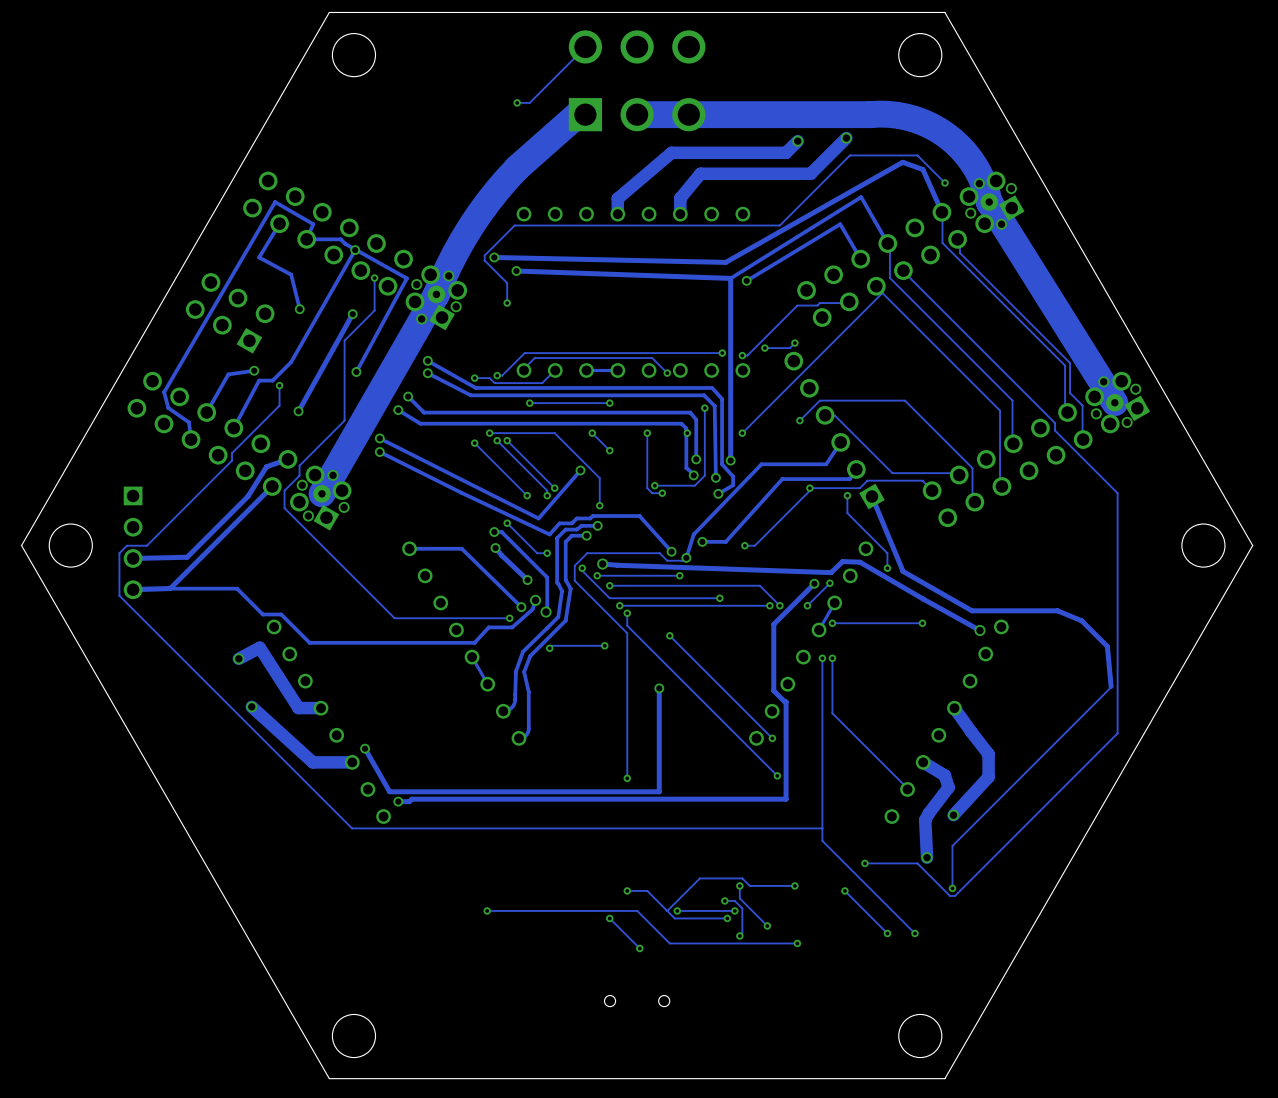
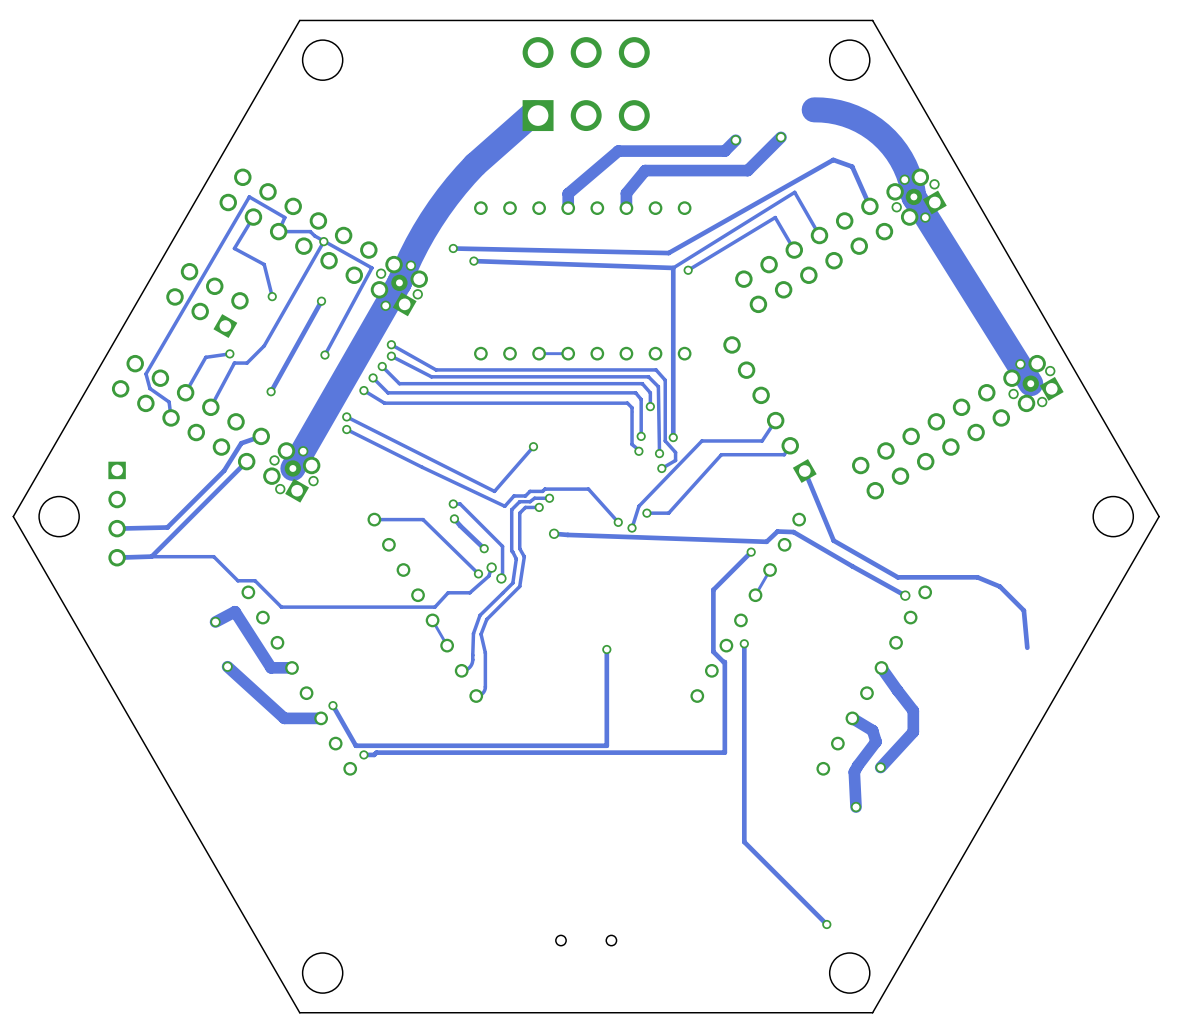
track: (585, 46) (529, 102) (517, 102) -> none
via: (517, 102) -> none
track: (637, 114) (878, 114) (905, 116) (938, 130) (959, 147) (980, 176) (989, 202) -> (814, 109) (838, 112) (853, 117) (880, 134) (901, 158) (910, 181) (913, 196)
track: (944, 182) (917, 155) (849, 155) (779, 225) (514, 225) (484, 255) (484, 260) (507, 283) (507, 303) -> none
via: (944, 182) -> none
track: (941, 212) (942, 243) (1065, 365) (1065, 410) (1067, 412) -> none
track: (957, 239) (959, 240) (959, 253) (1070, 363) (1070, 393) (1082, 405) (1083, 439) -> none
track: (887, 243) (889, 245) (889, 278) (1012, 400) (1013, 443) -> none
track: (903, 270) (1055, 423) (1055, 430) (1117, 493) (1117, 733) (954, 895) (949, 895) (917, 863) (864, 863) -> none
track: (374, 278) (374, 310) (344, 340) (344, 420) (299, 465) (299, 475) (284, 490) (284, 508) (394, 618) (509, 618) -> none
via: (374, 278) -> none
track: (849, 301) (797, 305) (747, 355) (742, 355) -> none
via: (507, 303) -> none
track: (794, 343) (789, 348) (764, 348) -> none
via: (794, 343) -> none
via: (764, 348) -> none
track: (722, 353) (524, 353) (502, 375) (497, 375) -> none
via: (722, 353) -> none
via: (742, 355) -> none
track: (523, 370) (534, 358) (652, 358) (667, 373) -> none
track: (555, 370) (542, 383) (494, 383) (489, 378) (474, 378) -> none
via: (667, 373) -> none
via: (497, 375) -> none
via: (474, 378) -> none
track: none -> (382, 366) (399, 383) (642, 383) (650, 392) (650, 406)
via: none -> (382, 366)
track: (279, 385) (279, 405) (232, 453) (232, 460) (146, 545) (126, 545) (119, 553) (119, 595) (352, 828) (822, 828) -> none
via: (279, 385) -> none
via: (529, 403) -> none
via: (609, 403) -> none
track: (704, 408) (704, 475) (694, 485) (654, 485) -> none
via: (704, 408) -> none
track: (825, 415) (834, 415) (892, 473) (957, 473) (959, 475) -> none
track: (799, 420) (819, 400) (904, 400) (972, 468) (972, 500) (974, 502) -> none
via: (799, 420) -> none
via: none -> (650, 406)
track: (489, 433) (554, 433) (599, 478) (599, 505) -> none
via: (489, 433) -> none
track: (592, 433) (609, 450) -> none
via: (592, 433) -> none
track: (647, 433) (647, 488) (652, 493) (662, 493) -> none
via: (647, 433) -> none
via: (687, 433) -> none
track: (742, 433) (882, 293) (876, 286) (1000, 410) (1000, 485) (1001, 486) -> none
via: (742, 433) -> none
track: (497, 440) (547, 490) (547, 495) -> none
via: (497, 440) -> none
track: (507, 440) (554, 488) -> none
via: (507, 440) -> none
track: (474, 443) (527, 495) -> none
via: (474, 443) -> none
via: (609, 450) -> none
via: (654, 485) -> none
via: (554, 488) -> none
track: (809, 488) (859, 488) (867, 480) (922, 480) (932, 490) -> none
via: (809, 488) -> none
track: (812, 488) (754, 545) (744, 545) -> none
via: (662, 493) -> none
via: (527, 495) -> none
via: (547, 495) -> none
track: (847, 495) (847, 513) (887, 553) (887, 568) -> none
via: (847, 495) -> none
via: (599, 505) -> none
track: (507, 523) (537, 553) (547, 553) -> none
via: (507, 523) -> none
via: (744, 545) -> none
via: (547, 553) -> none
track: (686, 557) (682, 560) (667, 560) (659, 553) (587, 553) (574, 565) (574, 580) (627, 633) (627, 778) -> none
track: (582, 568) (582, 570) (609, 598) (719, 598) -> none
via: (582, 568) -> none
via: (887, 568) -> none
via: (597, 575) -> none
track: (679, 575) (597, 575) -> none
via: (679, 575) -> none
track: (829, 583) (807, 605) -> none
via: (829, 583) -> none
track: (609, 585) (759, 585) (779, 605) -> none
via: (609, 585) -> none
via: (719, 598) -> none
via: (619, 605) -> none
track: (769, 605) (619, 605) -> none
via: (769, 605) -> none
via: (779, 605) -> none
via: (807, 605) -> none
track: (627, 613) (627, 625) (777, 775) -> none
via: (627, 613) -> none
via: (509, 618) -> none
via: (832, 623) -> none
track: (922, 623) (832, 623) -> none
via: (922, 623) -> none
track: (669, 635) (772, 738) -> none
via: (669, 635) -> none
track: (604, 645) (552, 645) (549, 648) -> none
via: (604, 645) -> none
via: (549, 648) -> none
track: (822, 658) (822, 840) (914, 933) -> none
via: (822, 658) -> none
track: (832, 658) (832, 713) (907, 789) -> none
via: (832, 658) -> none
track: none -> (744, 643) (744, 842) (826, 924)
via: none -> (744, 643)
track: (1111, 686) (952, 845) (952, 888) -> none
via: (772, 738) -> none
via: (777, 775) -> none
via: (627, 778) -> none
via: (864, 863) -> none
track: (739, 885) (739, 898) (767, 925) -> none
via: (739, 885) -> none
track: (794, 885) (749, 885) (742, 878) (699, 878) (667, 910) -> none
via: (794, 885) -> none
via: (952, 888) -> none
track: (627, 890) (647, 890) (674, 918) (727, 918) -> none
via: (627, 890) -> none
track: (844, 890) (887, 933) -> none
via: (844, 890) -> none
track: (724, 900) (734, 900) (742, 908) (742, 933) (739, 935) -> none
via: (724, 900) -> none
track: (487, 910) (637, 910) (669, 943) (797, 943) -> none
via: (487, 910) -> none
via: (677, 910) -> none
track: (734, 910) (677, 910) -> none
via: (734, 910) -> none
track: (609, 918) (639, 948) -> none
via: (609, 918) -> none
via: (727, 918) -> none
via: (767, 925) -> none
via: (887, 933) -> none
via: (914, 933) -> none
via: (739, 935) -> none
via: (797, 943) -> none
via: (639, 948) -> none
via: none -> (826, 924)

